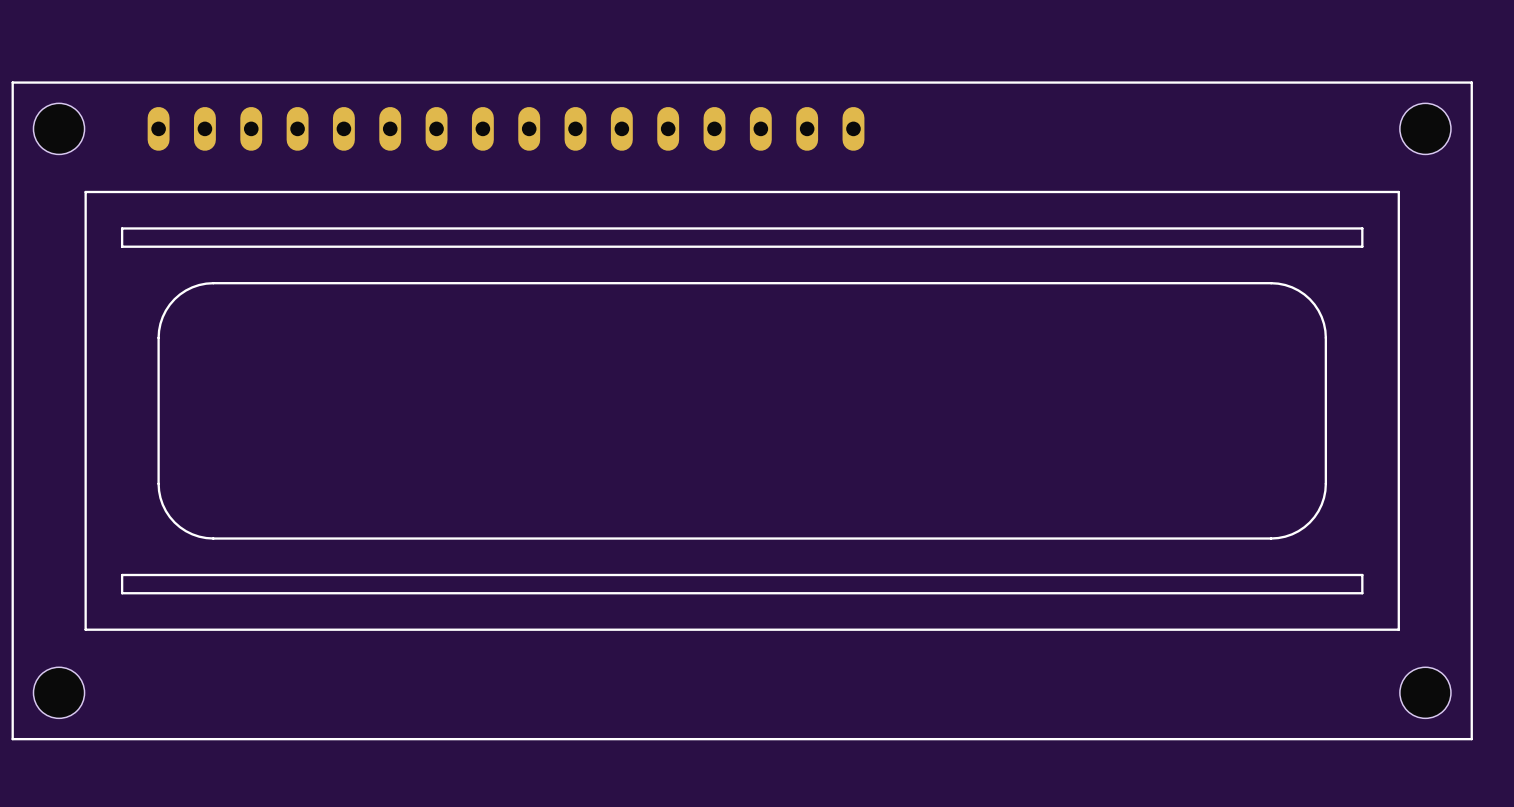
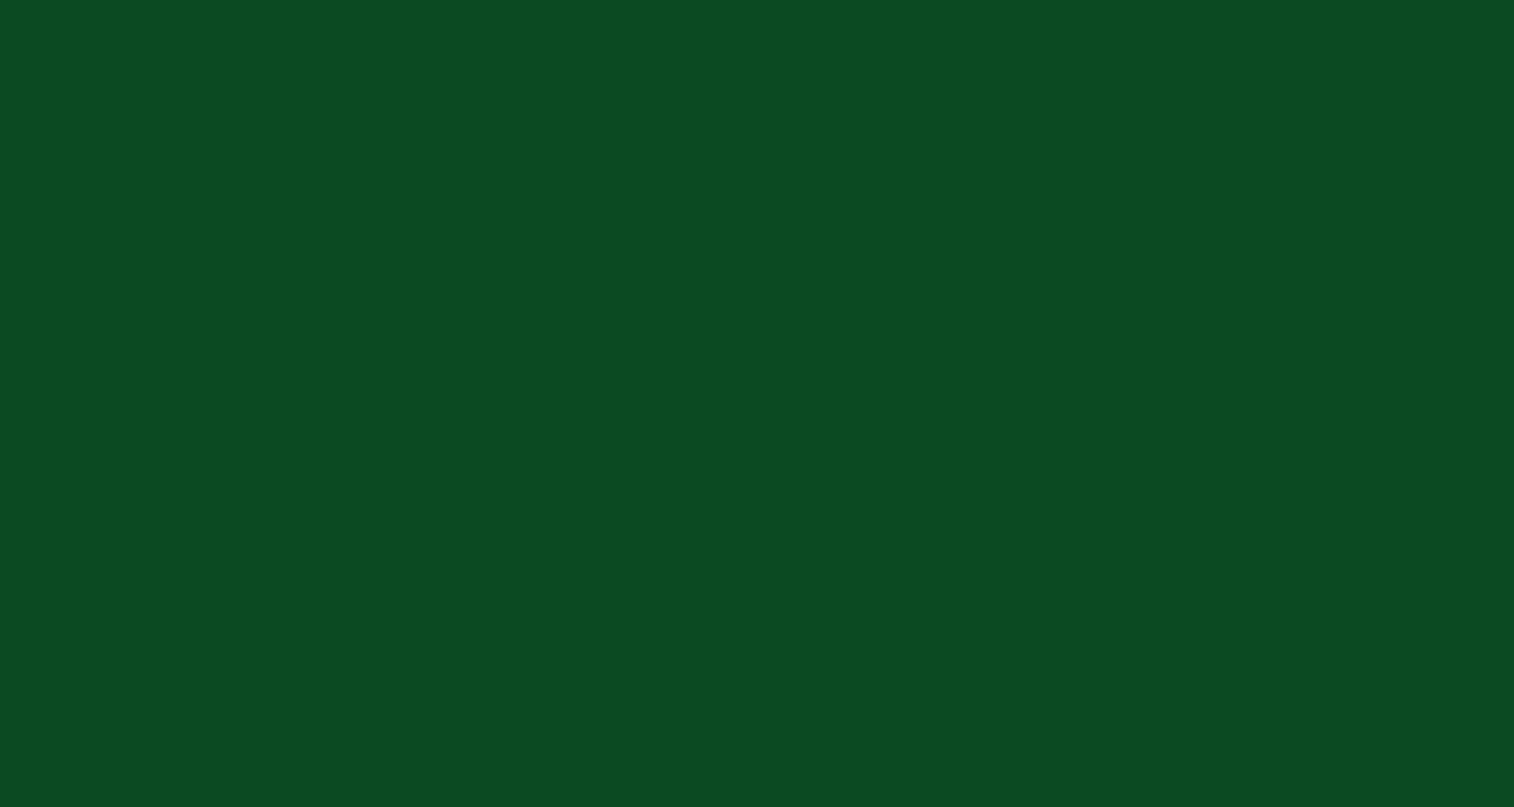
part: (742, 410) -> none

